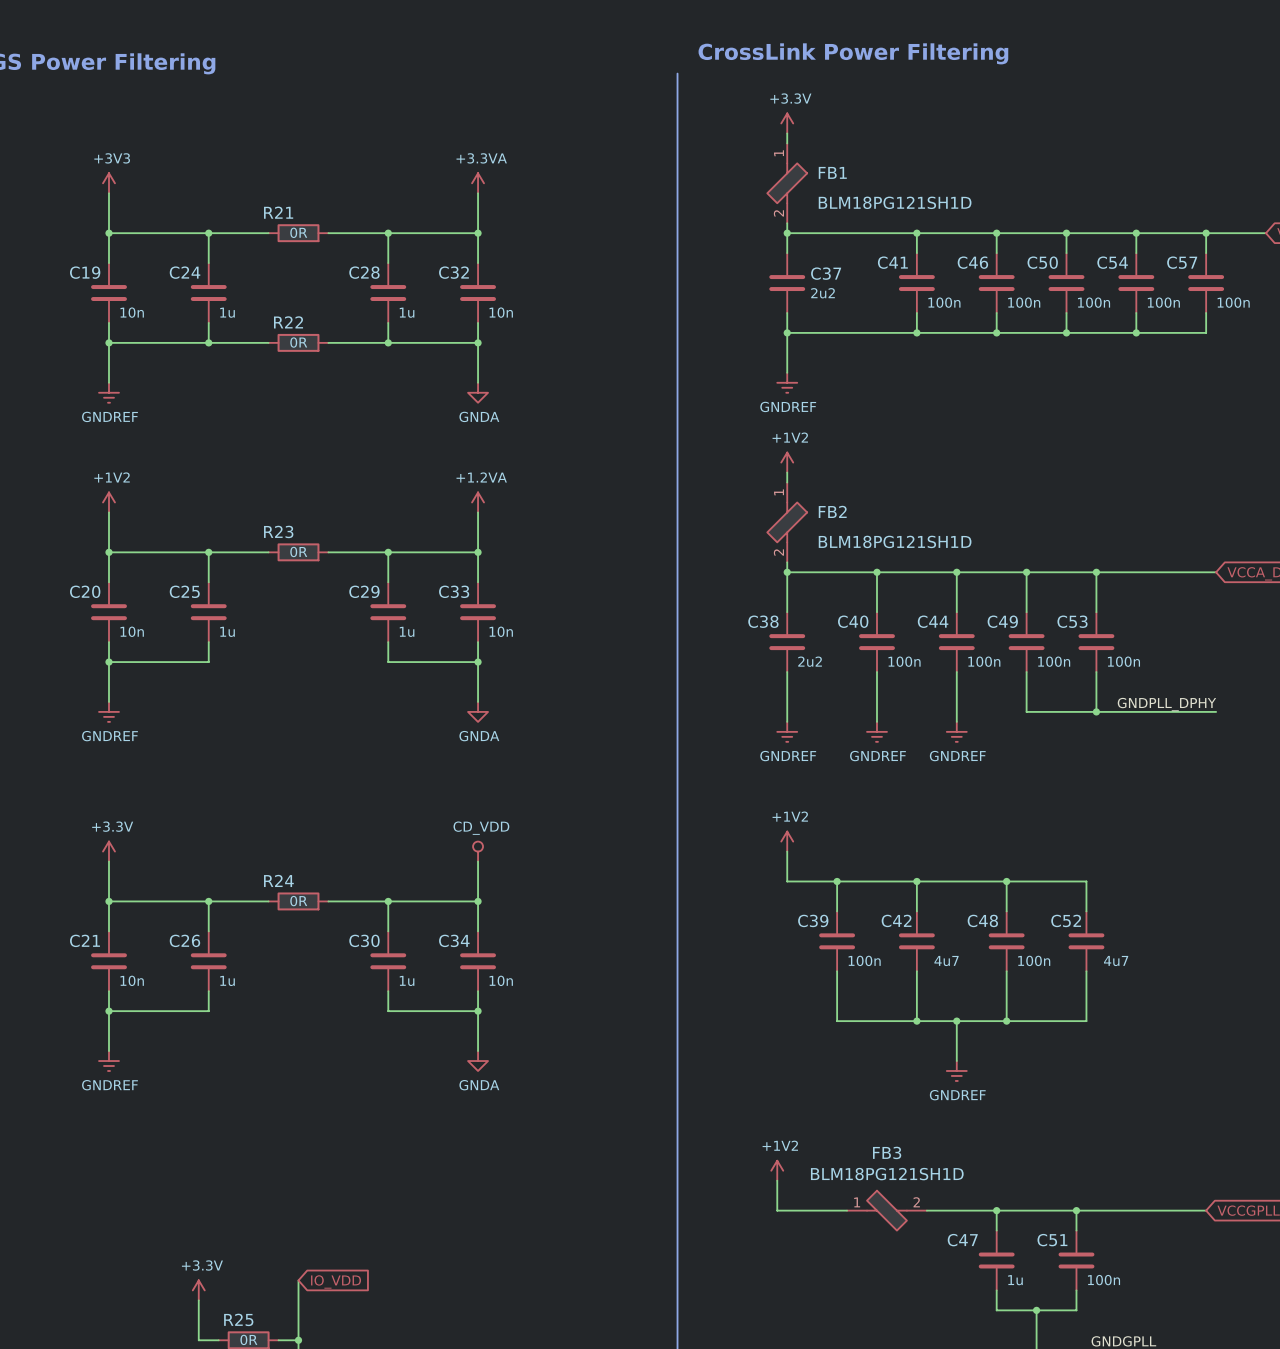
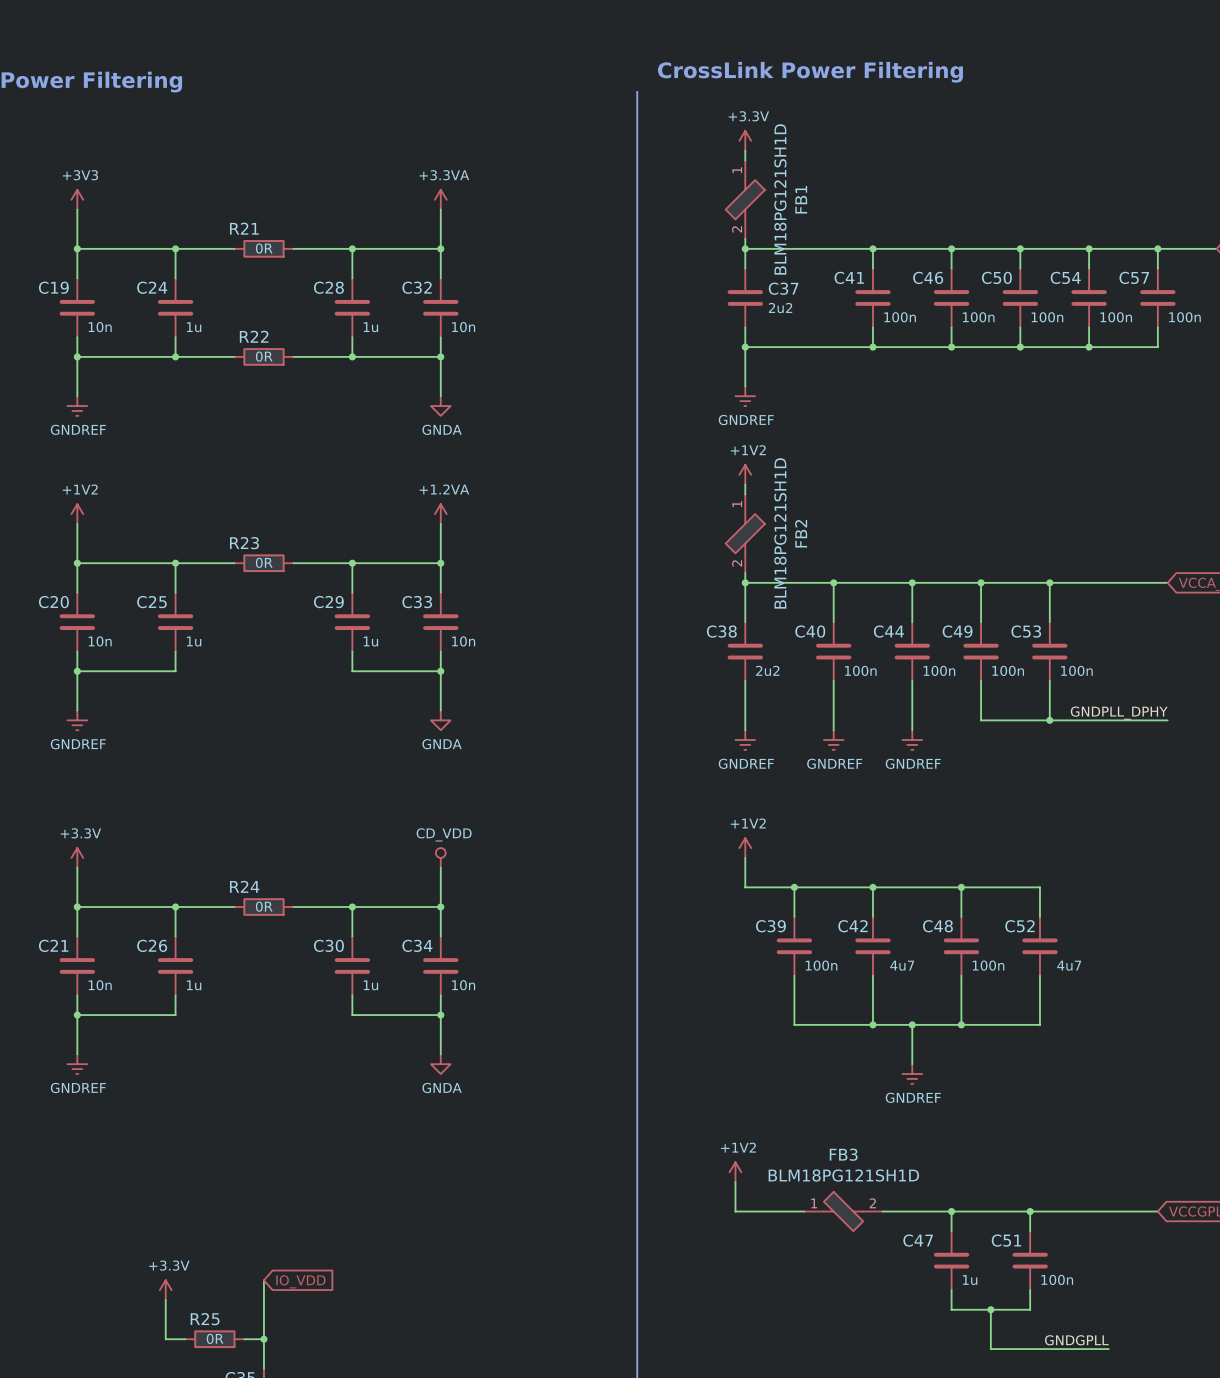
FB1 name rotation: 0° (832, 172) -> 90° counterclockwise (801, 199)
FB1 value rotation: 0° (895, 202) -> 90° counterclockwise (780, 199)
FB2 name rotation: 0° (832, 511) -> 90° counterclockwise (801, 533)
FB2 value rotation: 0° (895, 541) -> 90° counterclockwise (780, 533)

